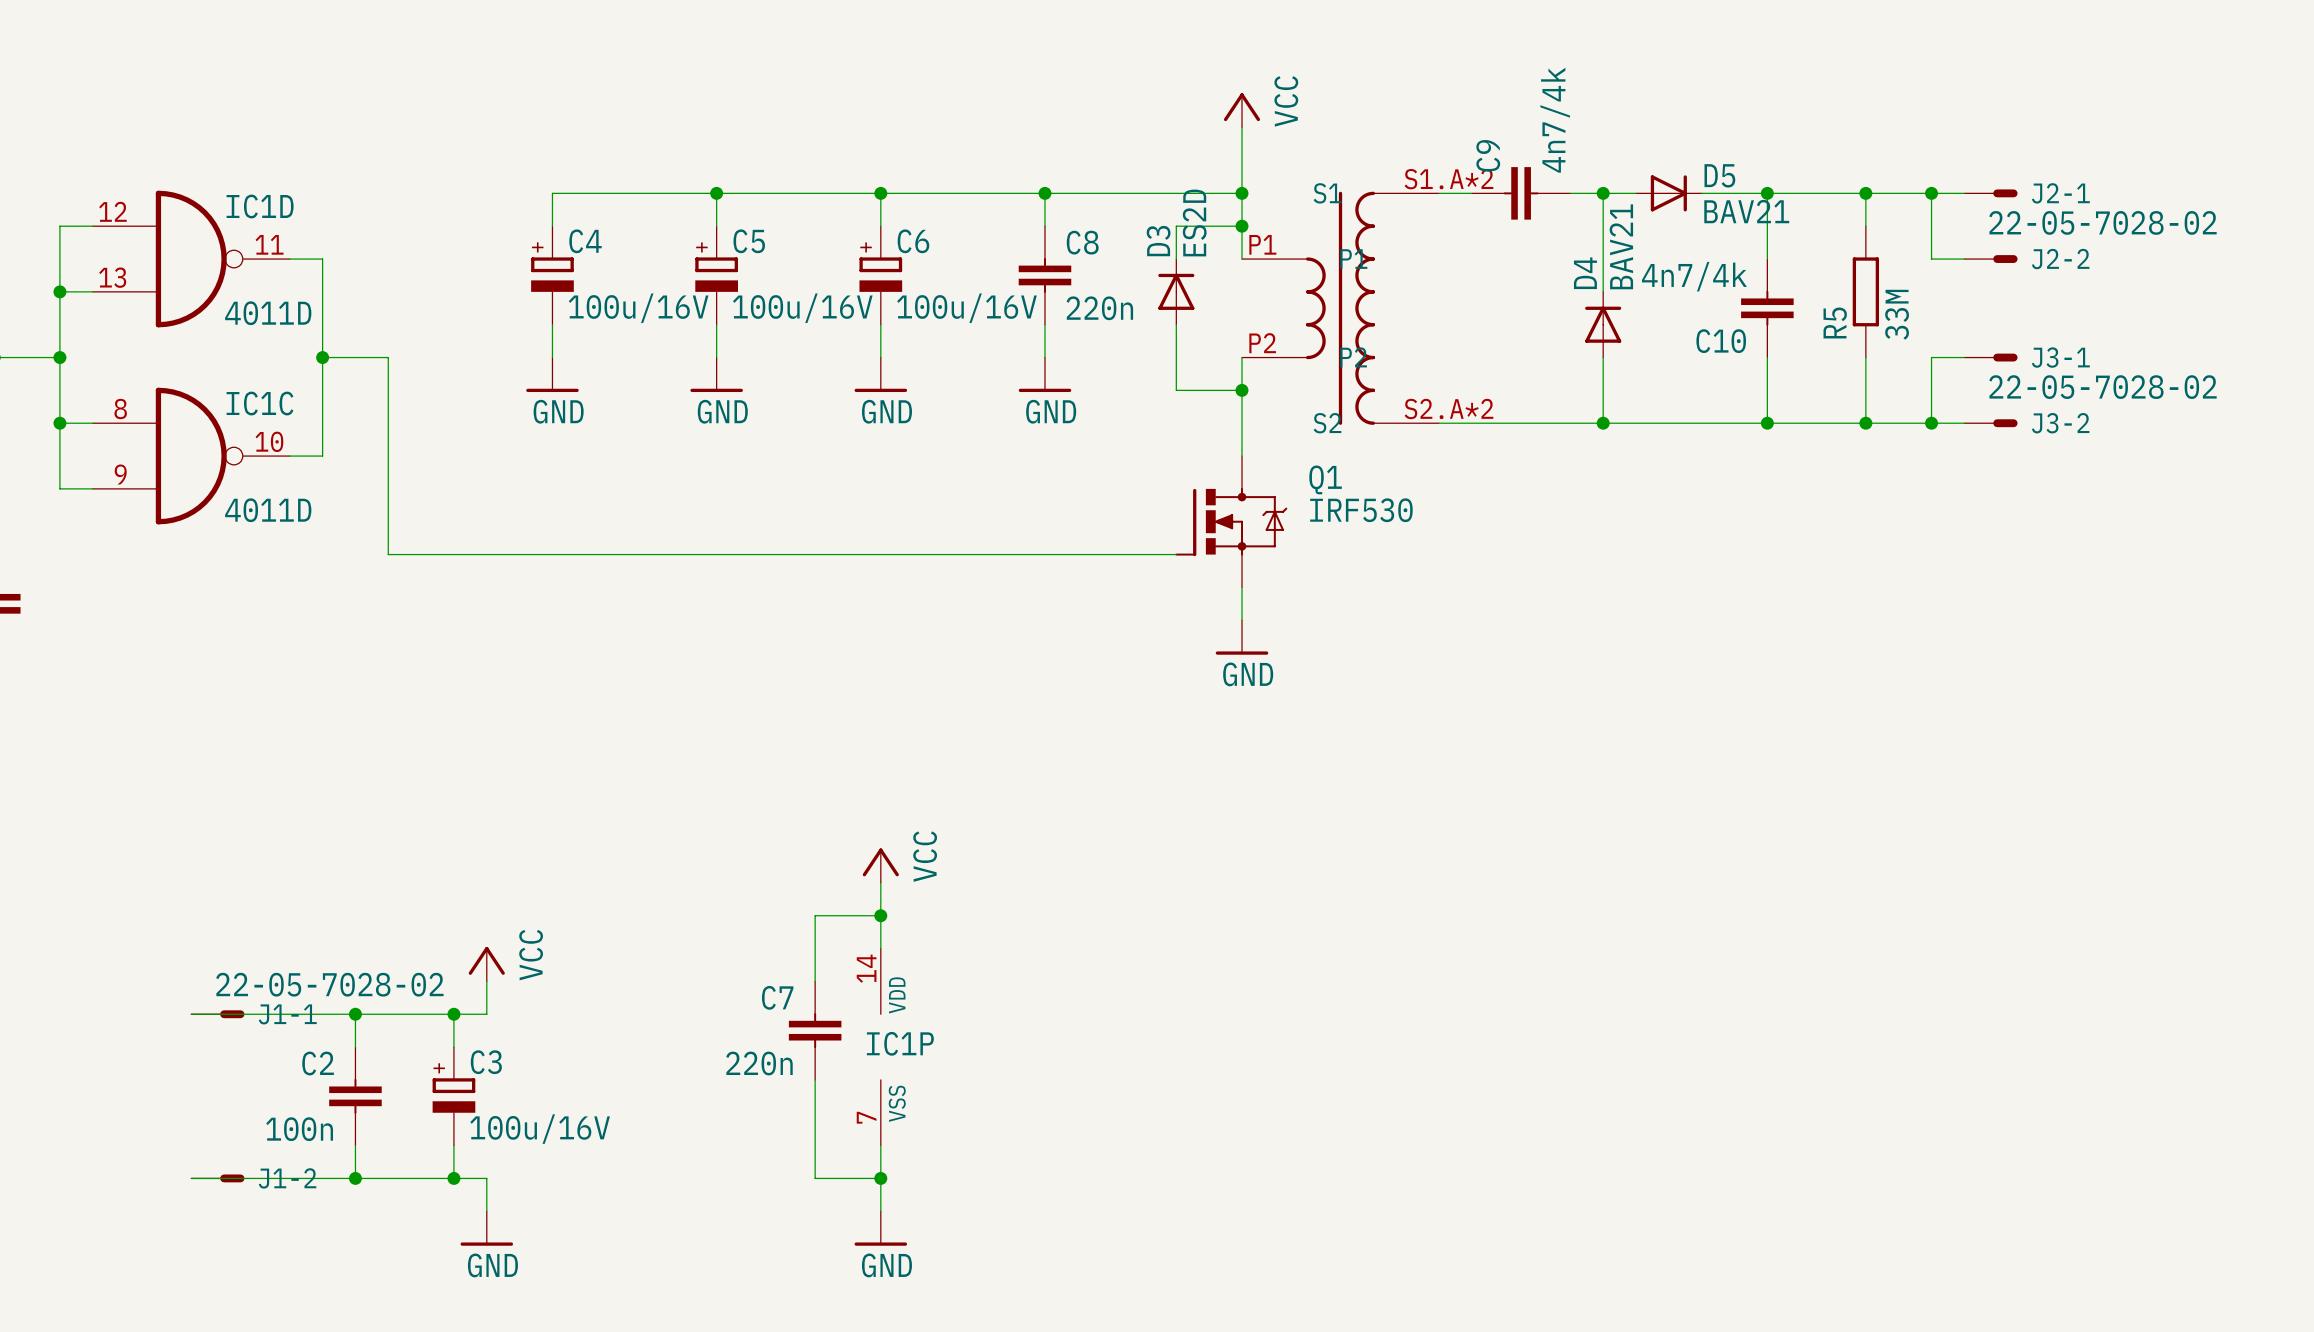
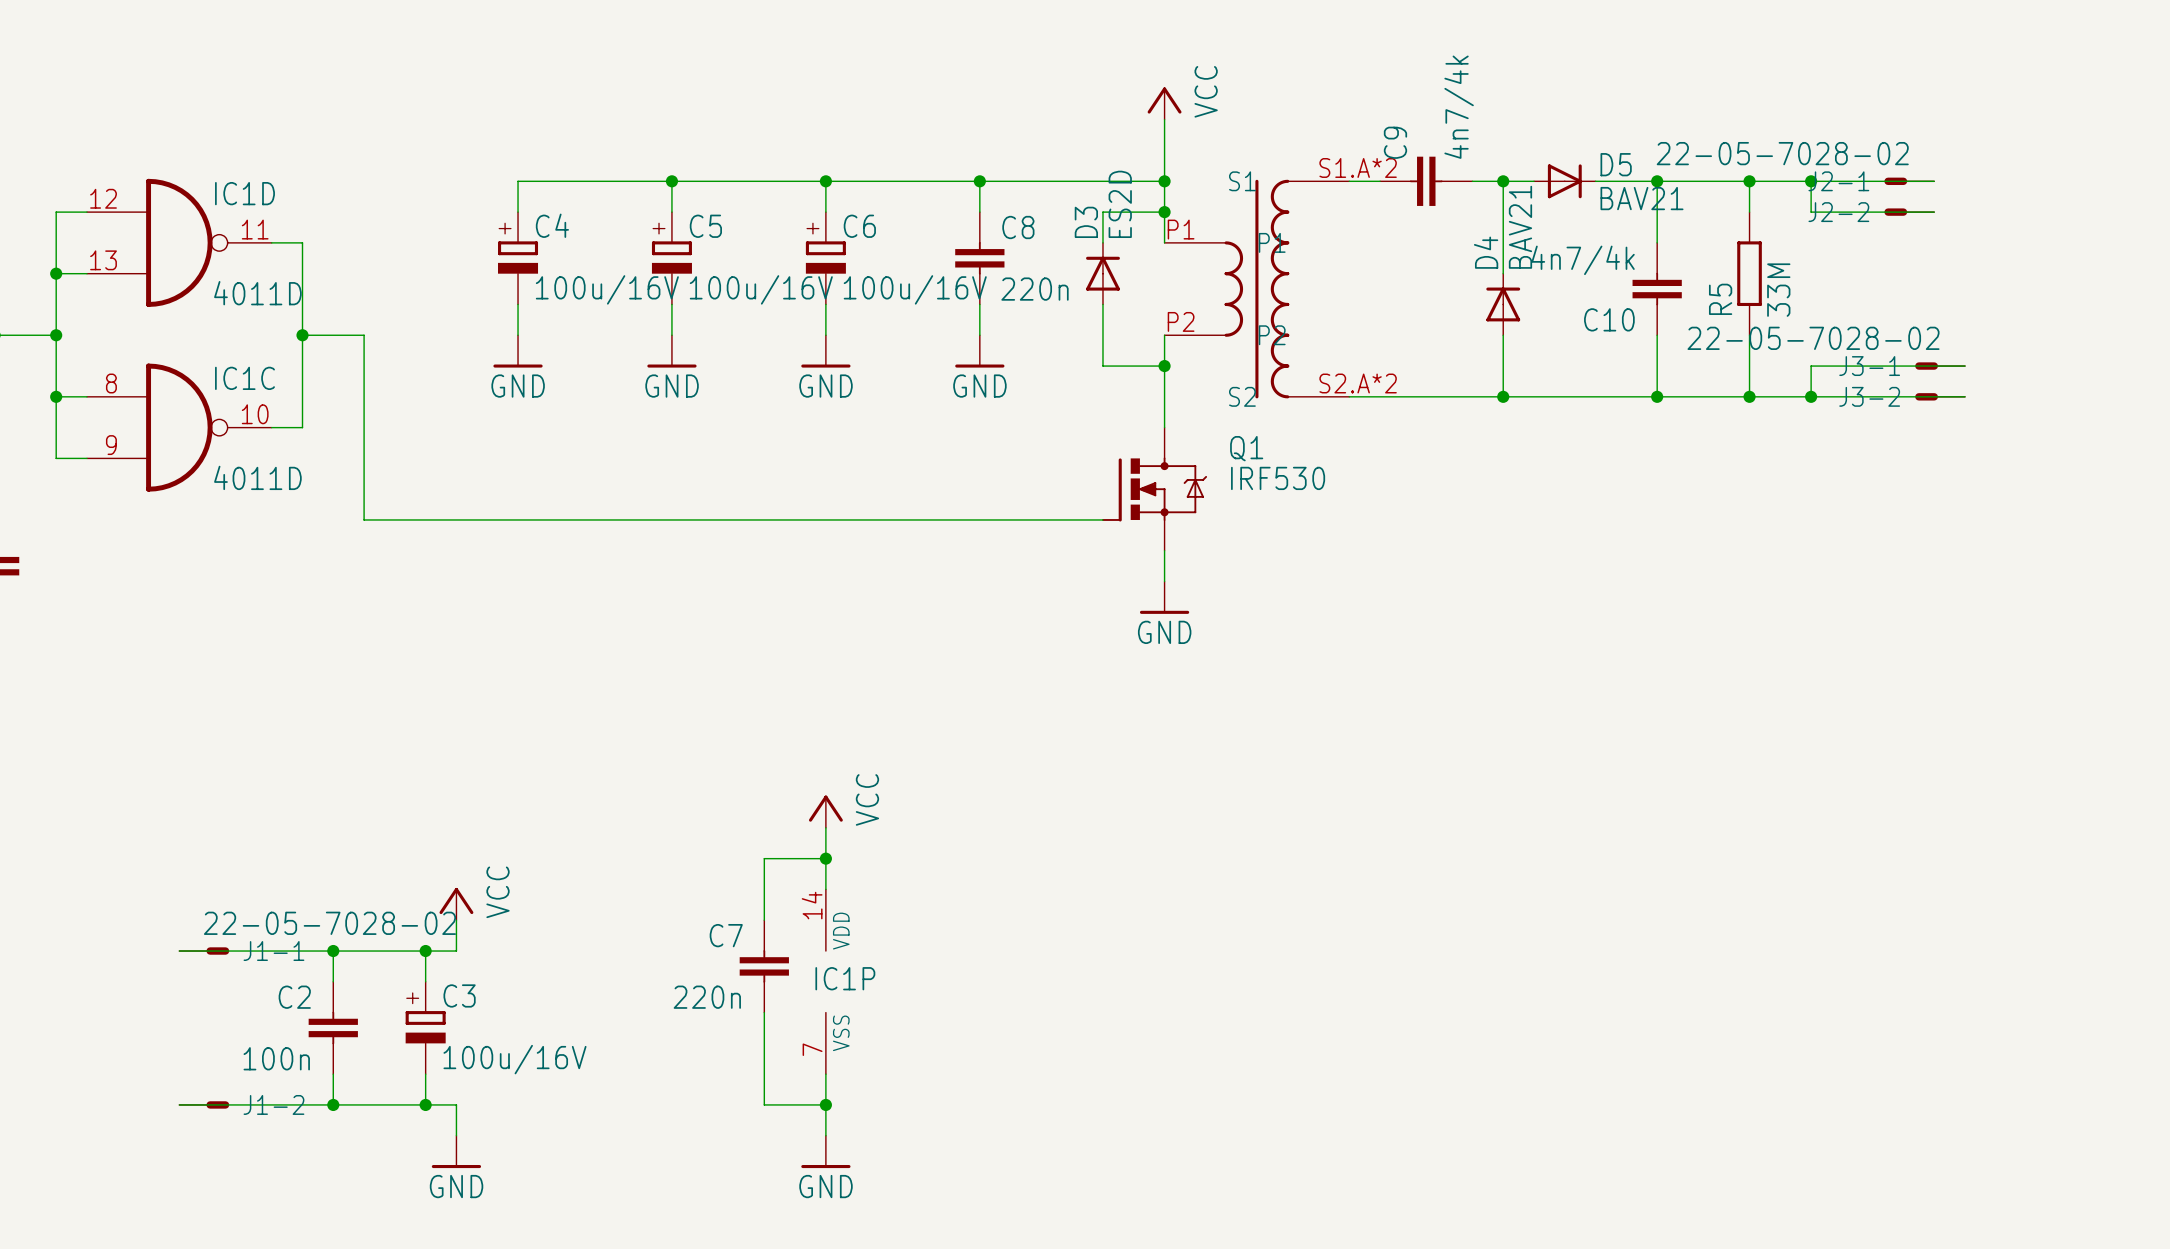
J2-1 position: (1990, 193) -> (1909, 181)
J2-1 rotation: 0° (2005, 193) -> 180° (1895, 181)
wire: (1931, 226) (1931, 259) (1964, 259) -> (1811, 212) (1934, 212)
J2-2 position: (1990, 259) -> (1909, 212)
J2-2 rotation: 0° (2005, 259) -> 180° (1895, 212)
wire: (1964, 357) (1931, 357) (1931, 390) -> (1965, 366) (1811, 366)
J3-1 position: (1990, 357) -> (1940, 366)
J3-1 rotation: 0° (2005, 357) -> 180° (1926, 366)
wire: none -> (1841, 396) (1965, 396)
J3-2 position: (1990, 423) -> (1940, 396)
J3-2 rotation: 0° (2005, 423) -> 180° (1926, 396)

